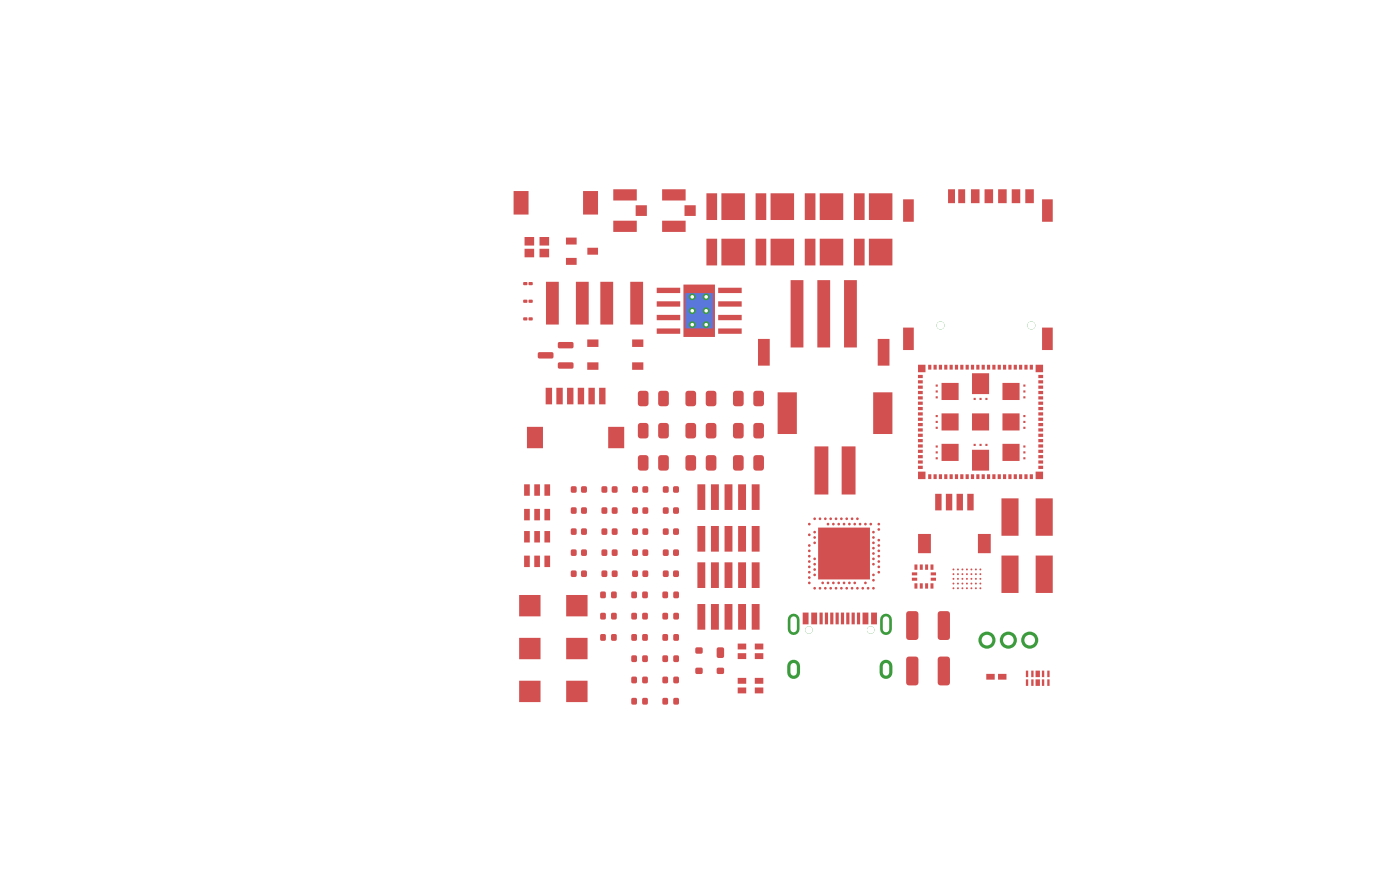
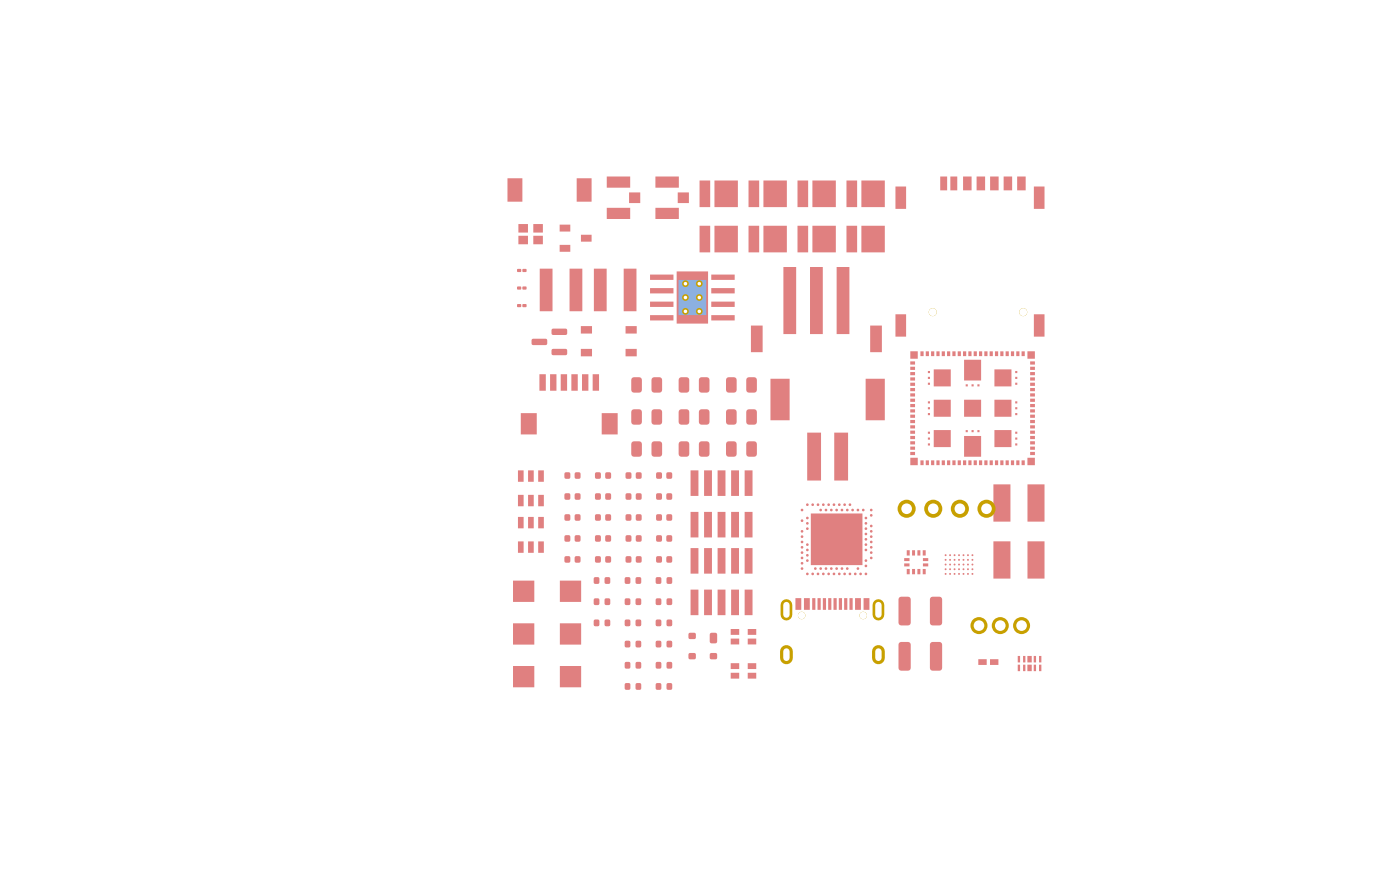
part footprint: [918, 493, 991, 554] -> [897, 499, 996, 518]

